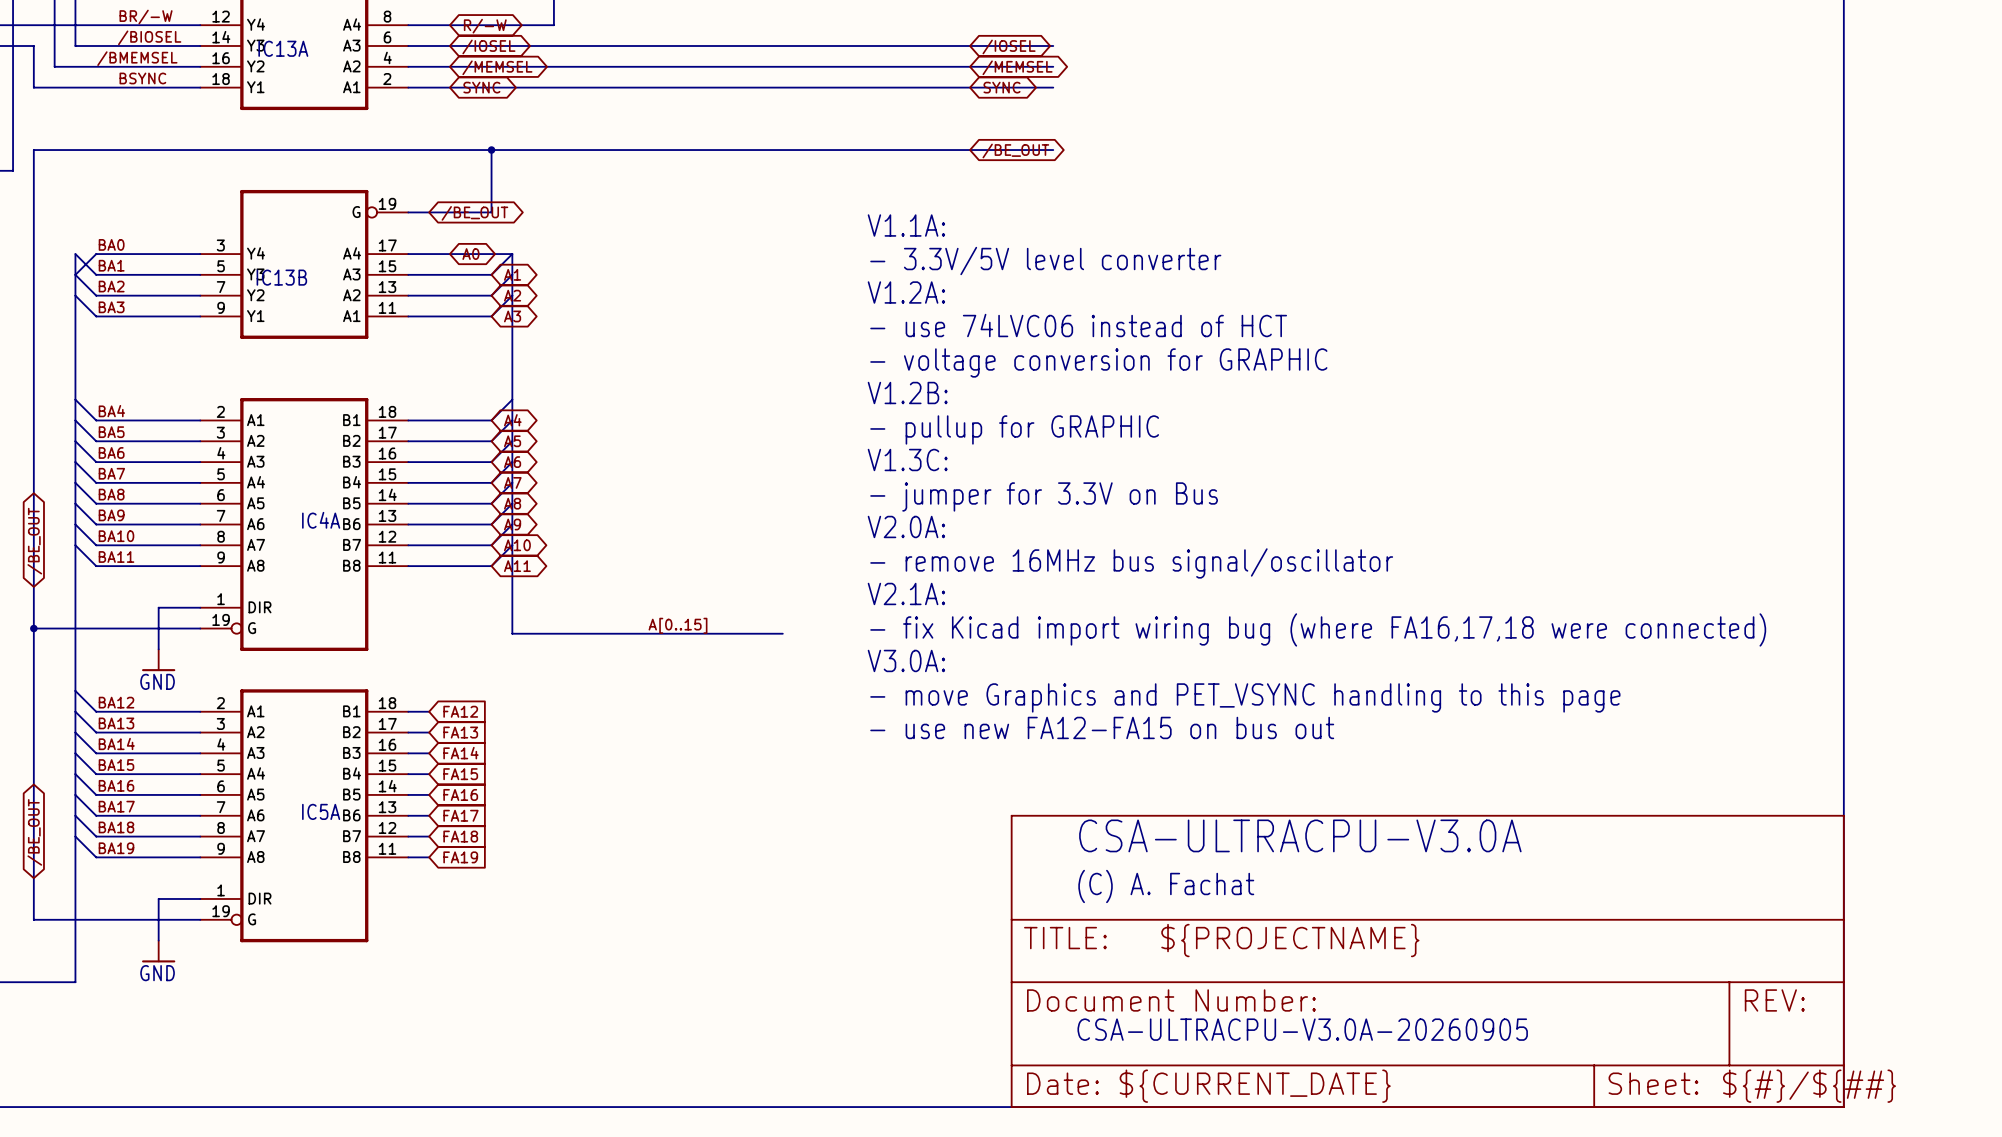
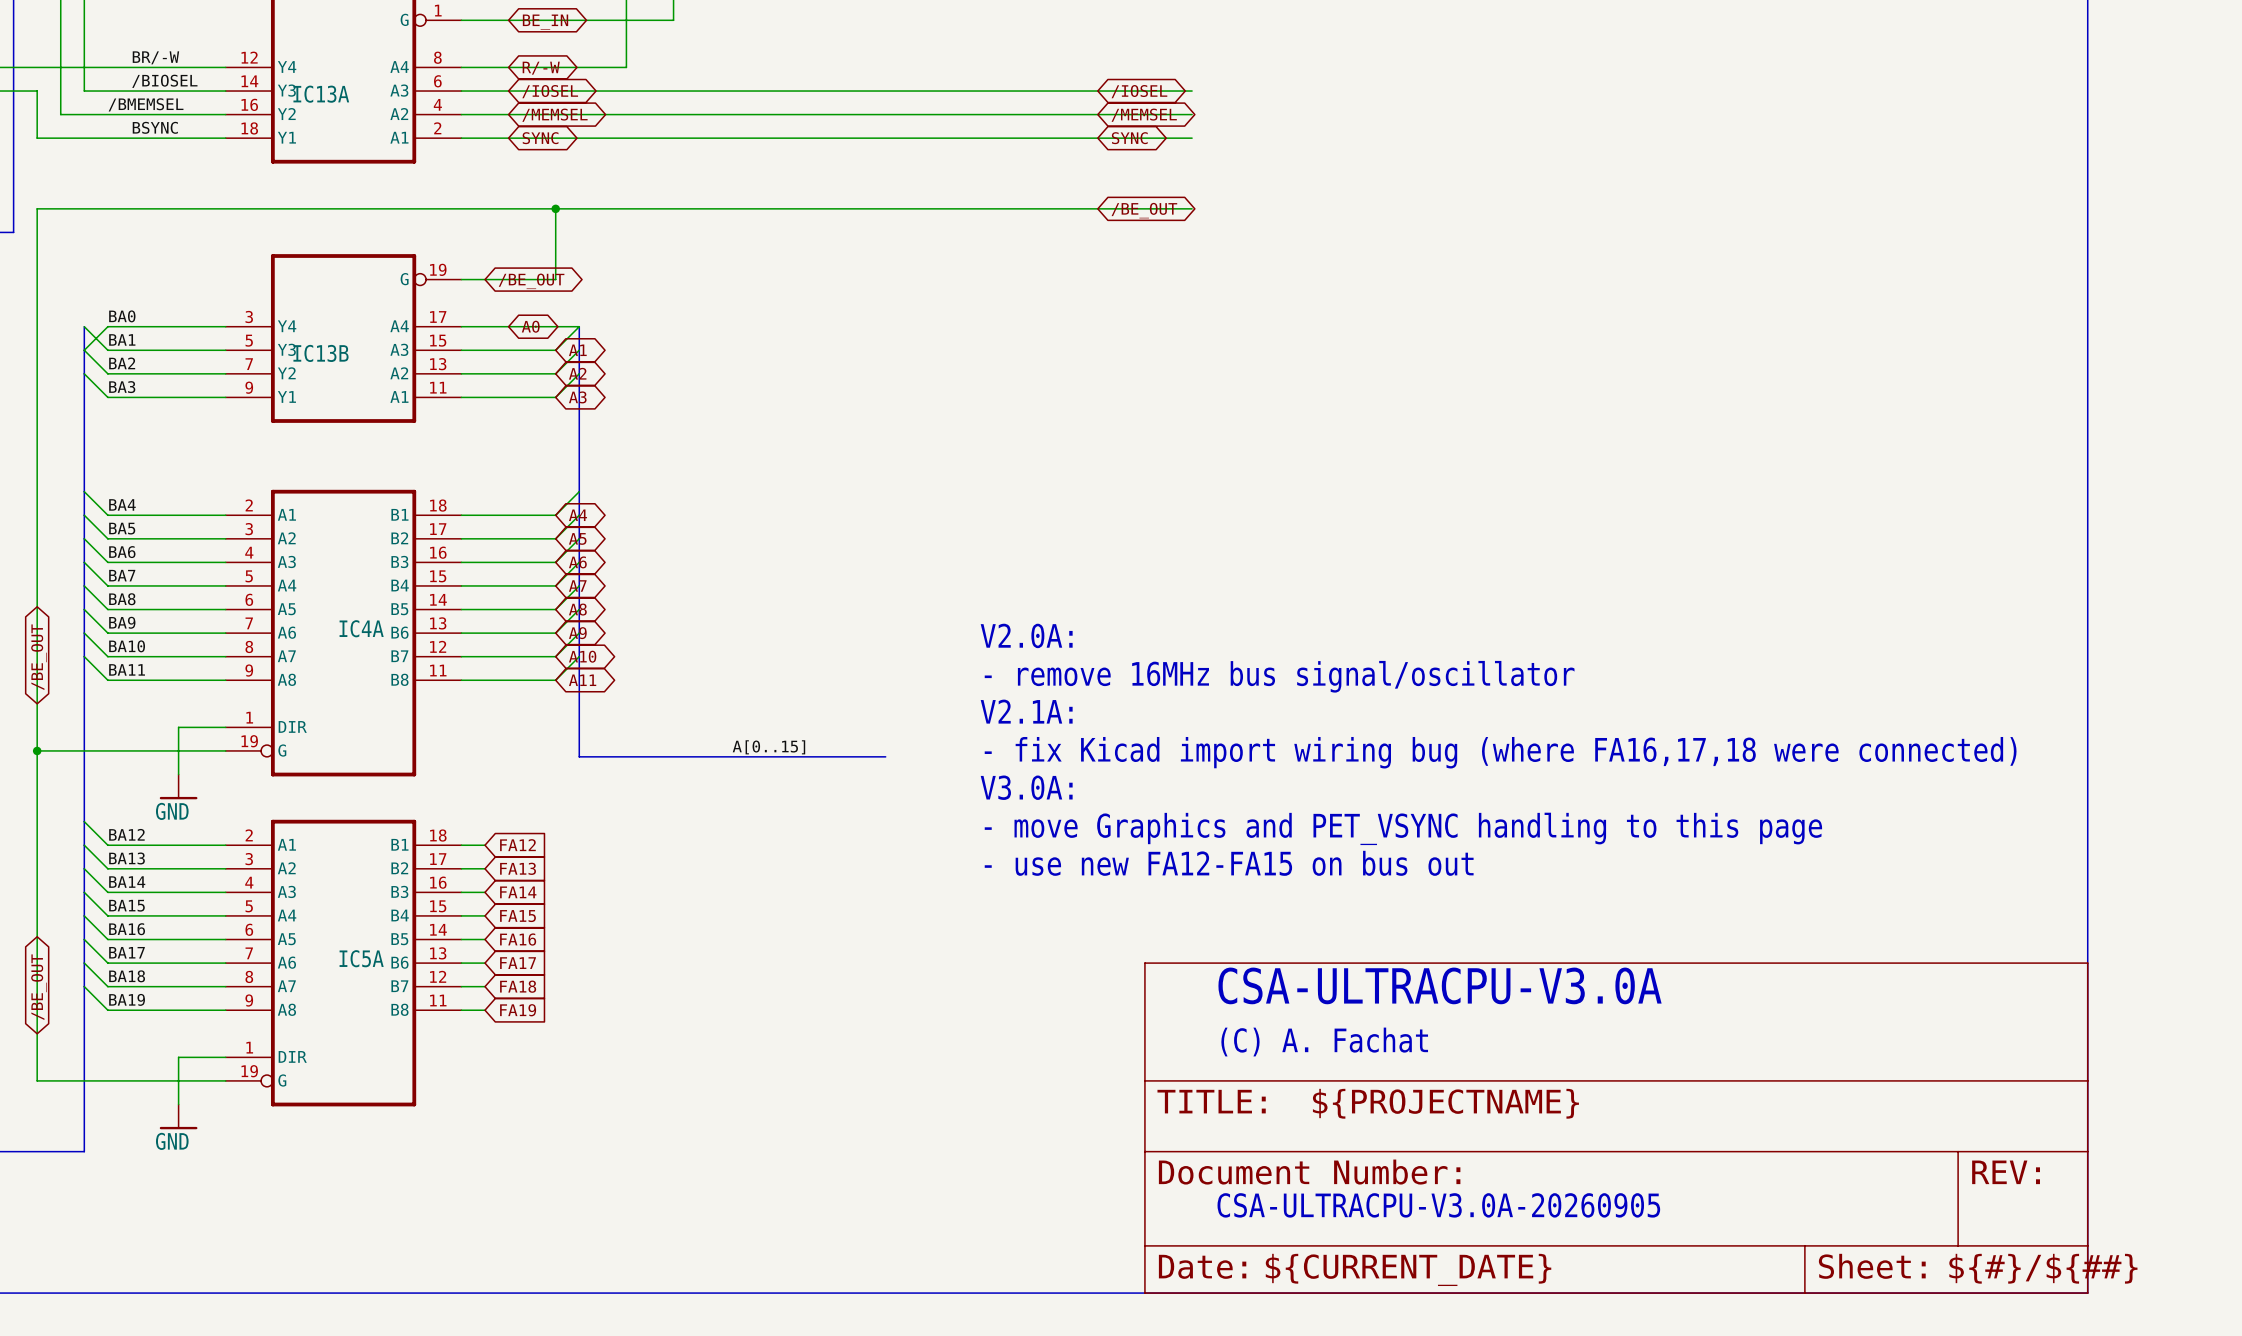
text: V1.1A: (906, 225) -> none
text: - 3.3V/5V level converter (1045, 261) -> none
text: V1.2A: (906, 292) -> none
text: - use 74LVC06 instead of HCT (1078, 325) -> none
text: - voltage conversion for GRAPHIC (1098, 362) -> none
text: V1.2B: (907, 393) -> none
text: - pullup for GRAPHIC (1014, 429) -> none
text: V1.3C: (907, 459) -> none
text: - jumper for 3.3V on Bus (1044, 496) -> none

